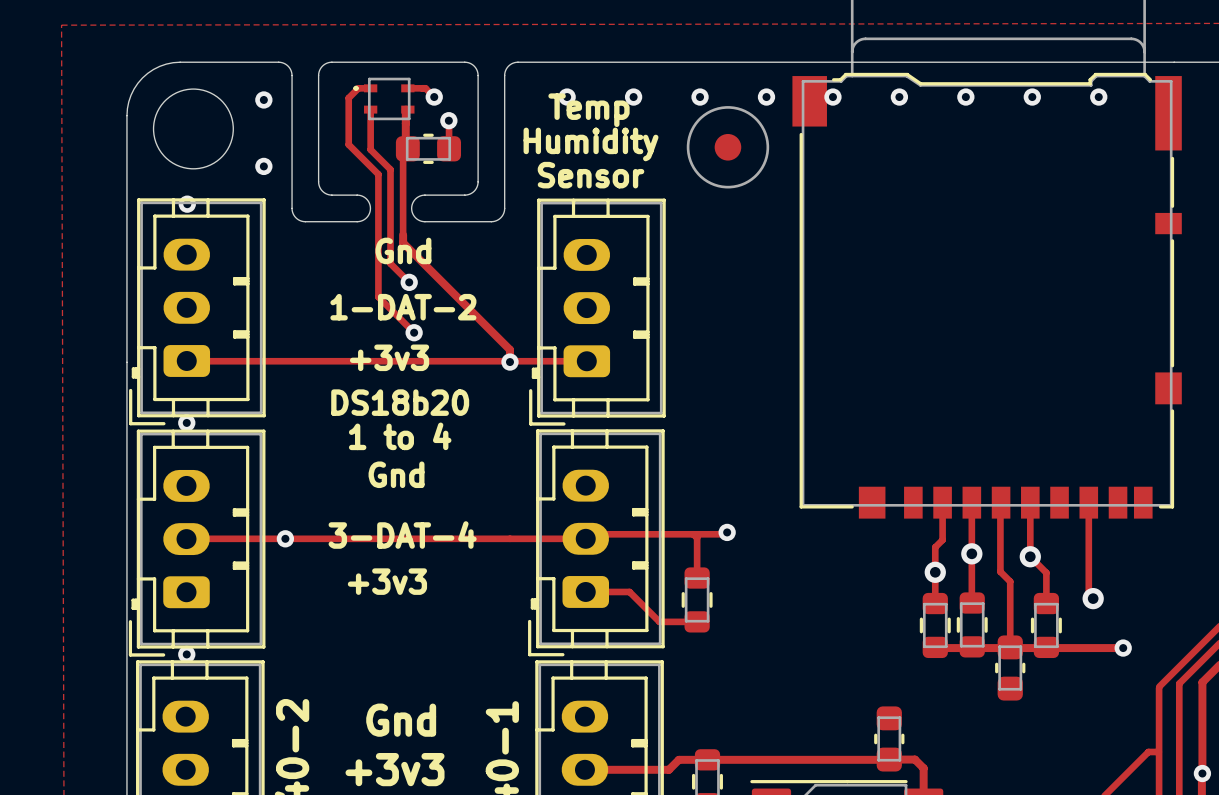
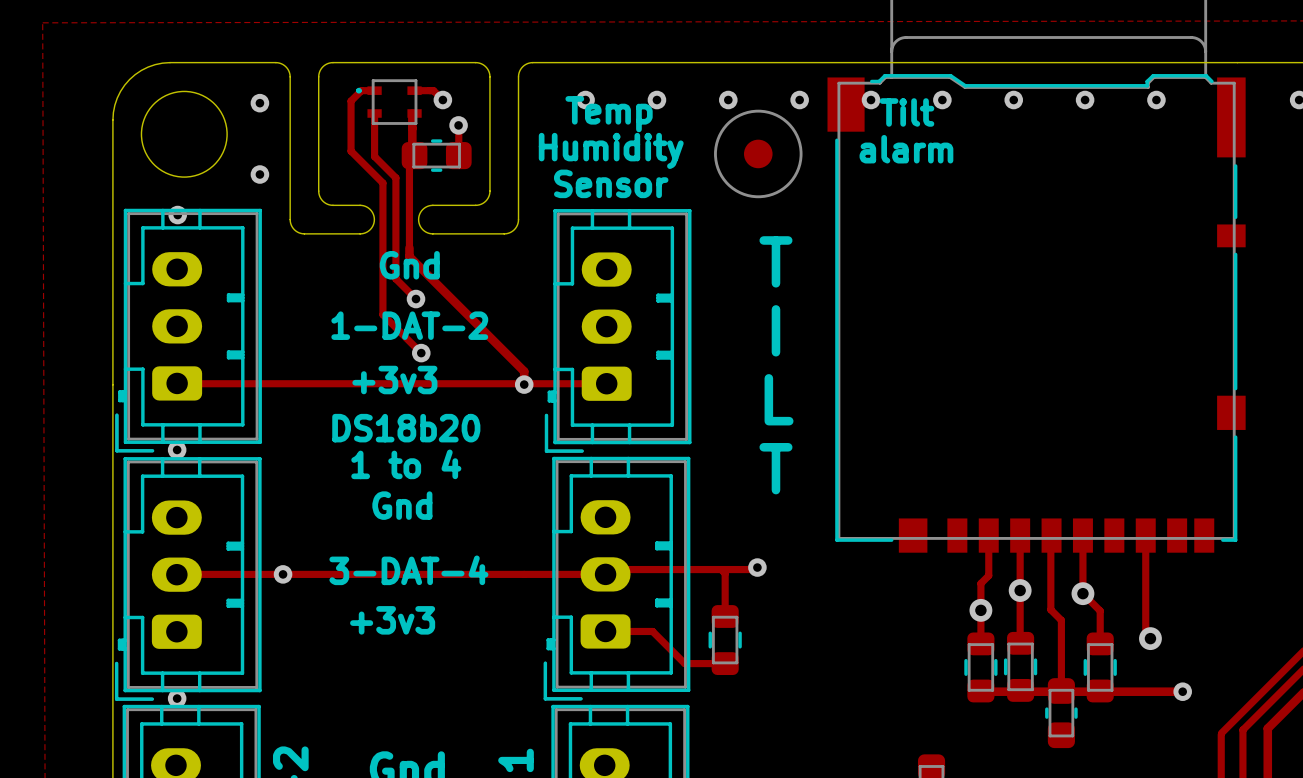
text: none -> Tilt (906, 112)
text: none -> alarm (906, 149)
text: none -> T (775, 261)
text: none -> I (775, 330)
text: none -> L (779, 399)
text: none -> T (775, 468)

